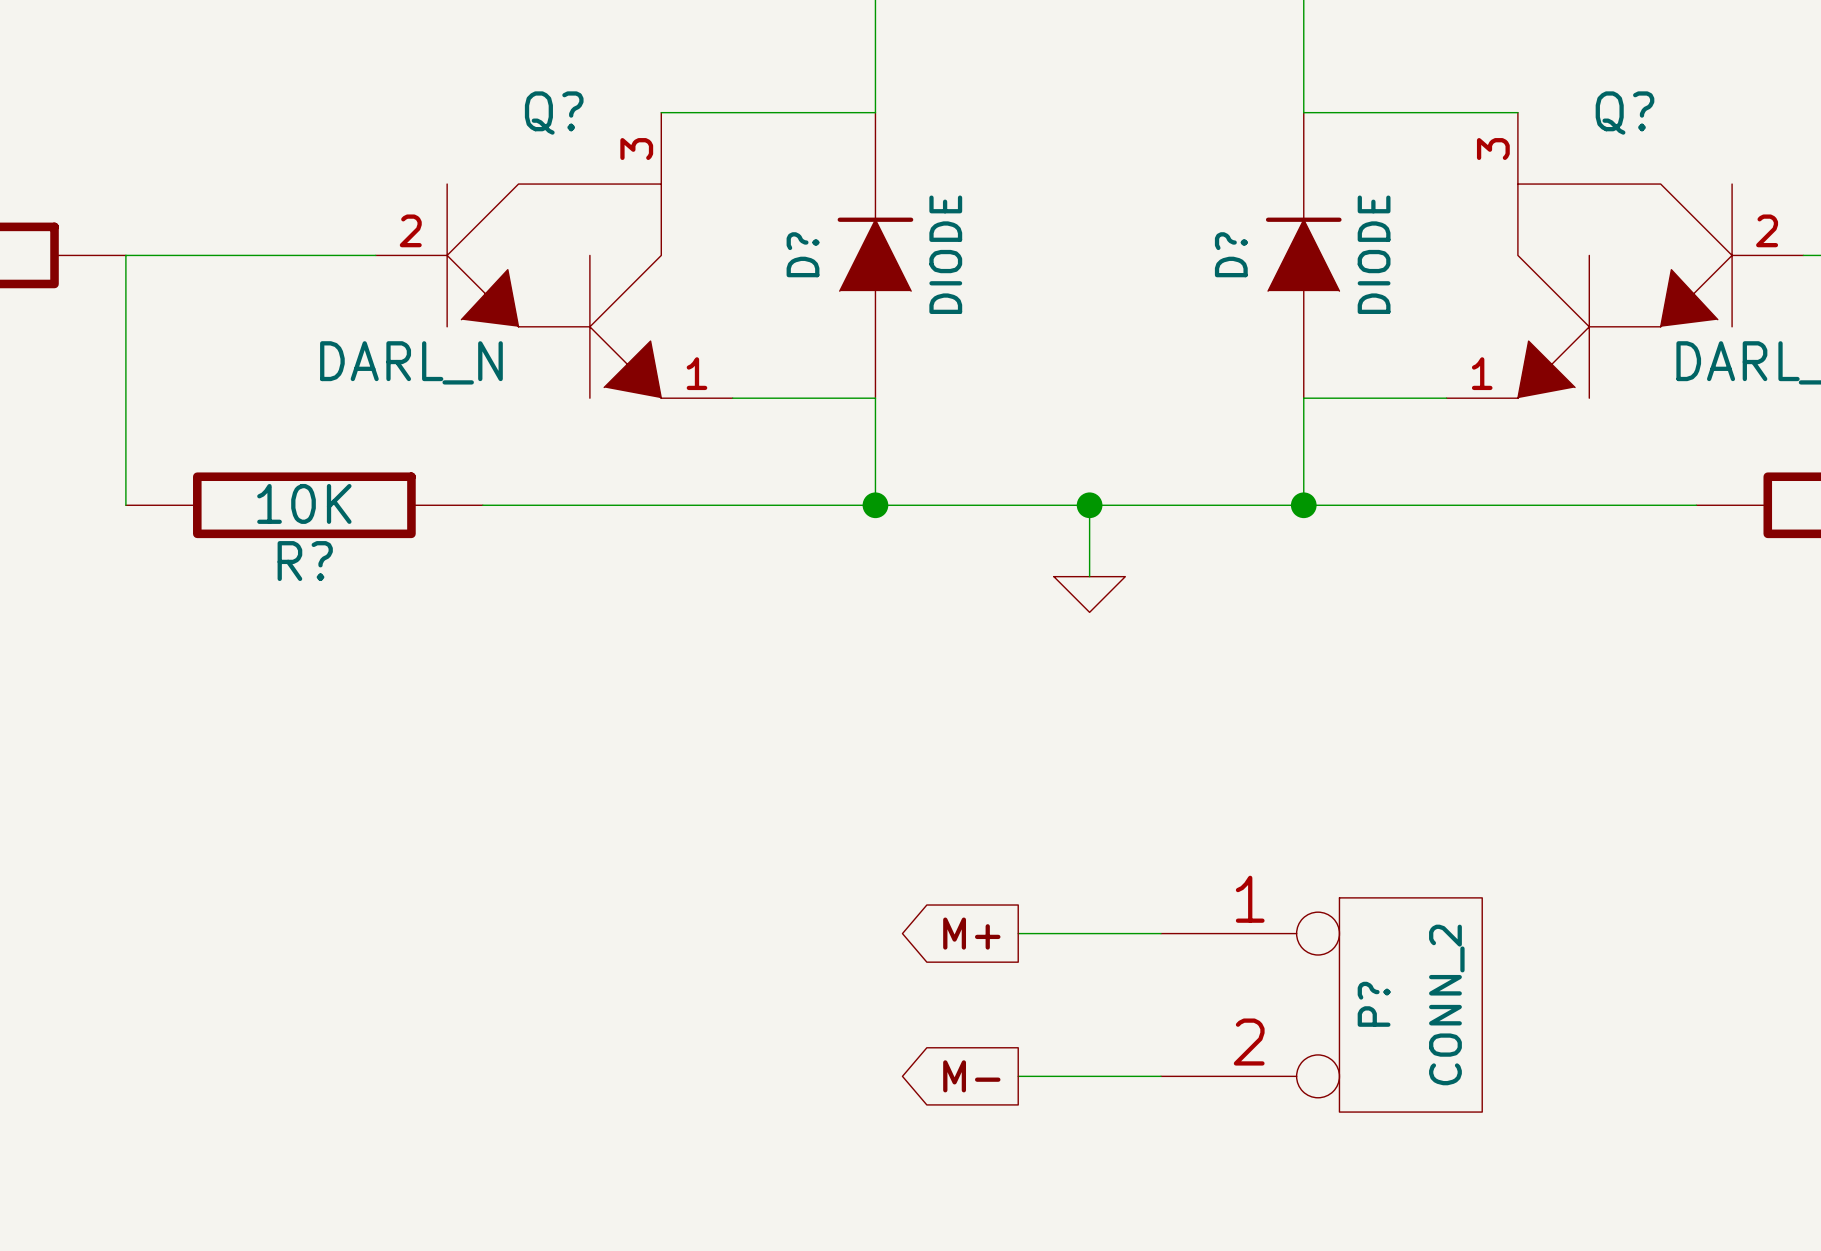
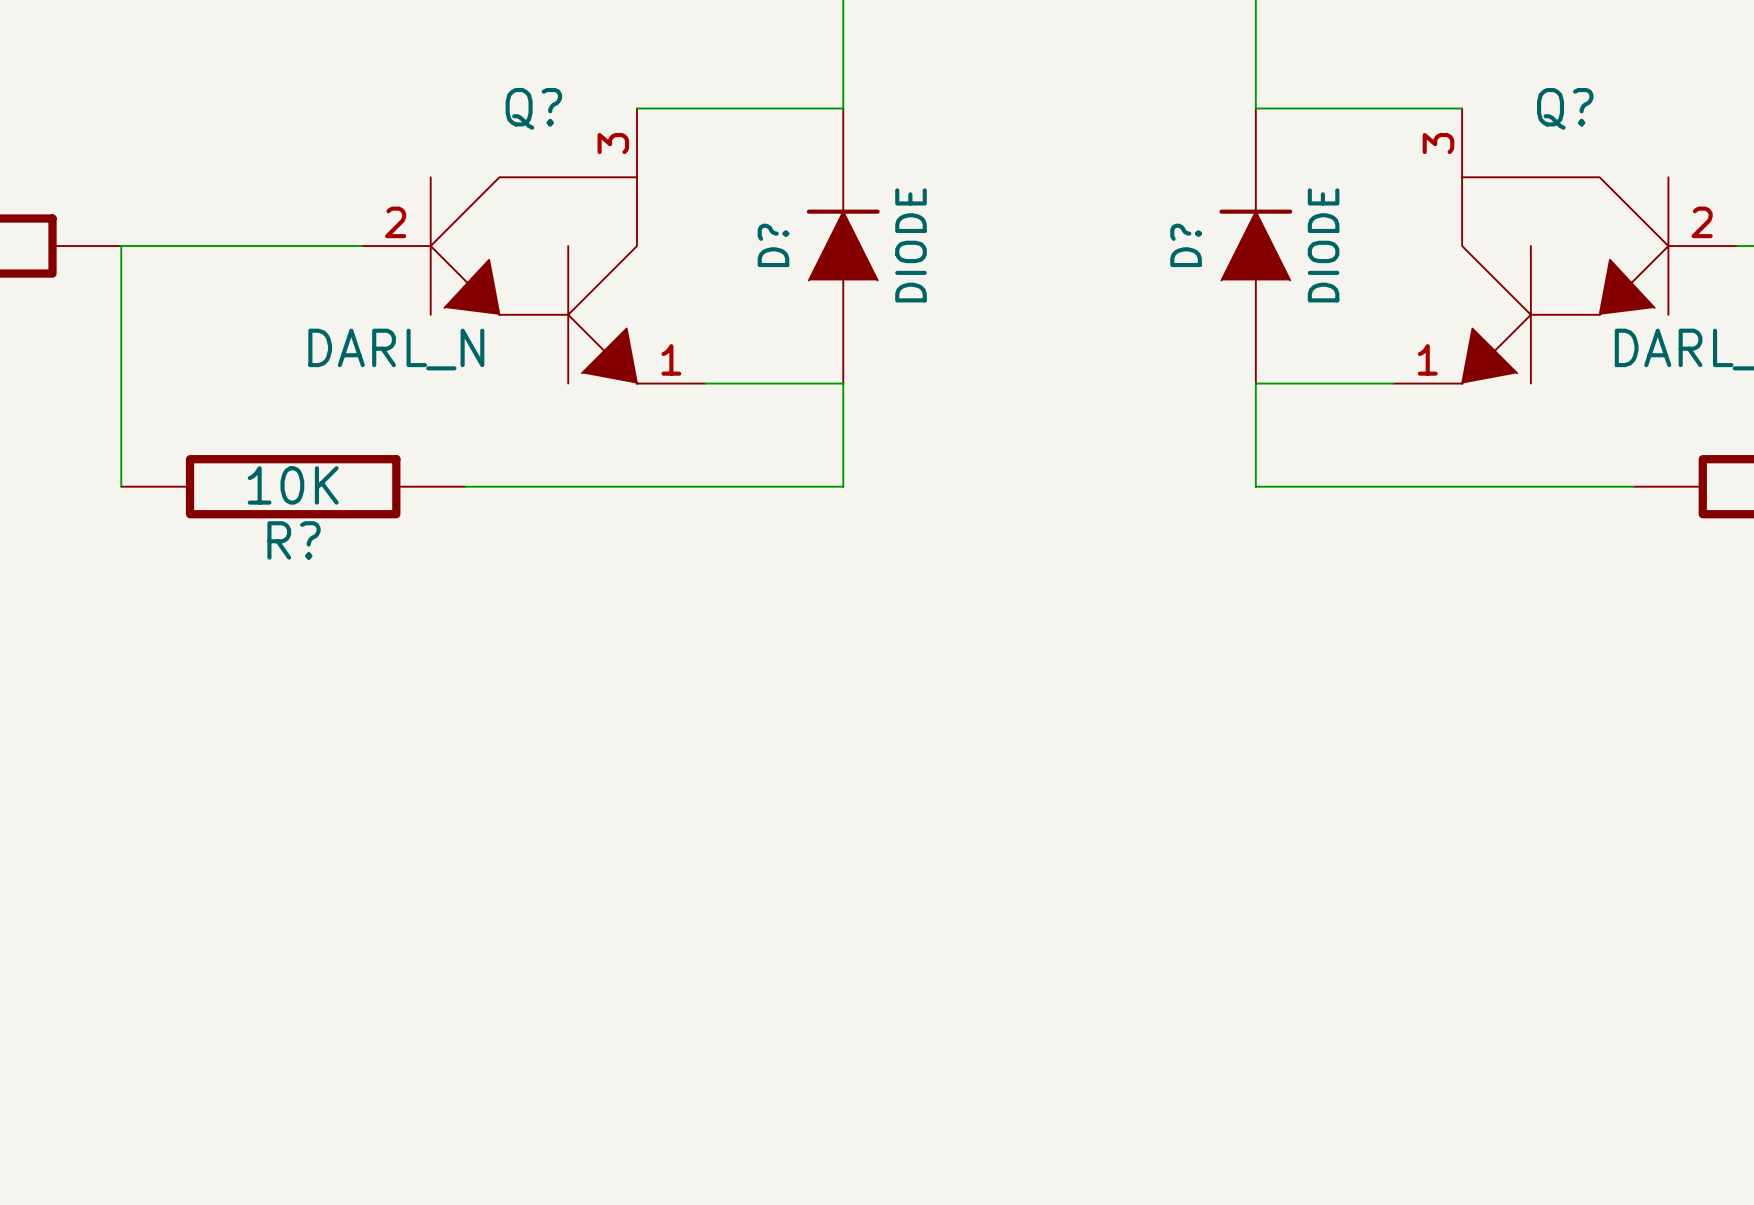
wire: (875, 505) (1303, 505) -> none
junction: (875, 505) -> none
wire: (1089, 505) (1089, 576) -> none
junction: (1089, 505) -> none
junction: (1303, 505) -> none
power symbol: (1089, 594) -> none
global label: M+ (971, 933) -> none
wire: (1018, 933) (1160, 933) -> none
P?: CONN_2 (1321, 1004) -> none
global label: M- (971, 1076) -> none
wire: (1018, 1076) (1160, 1076) -> none

